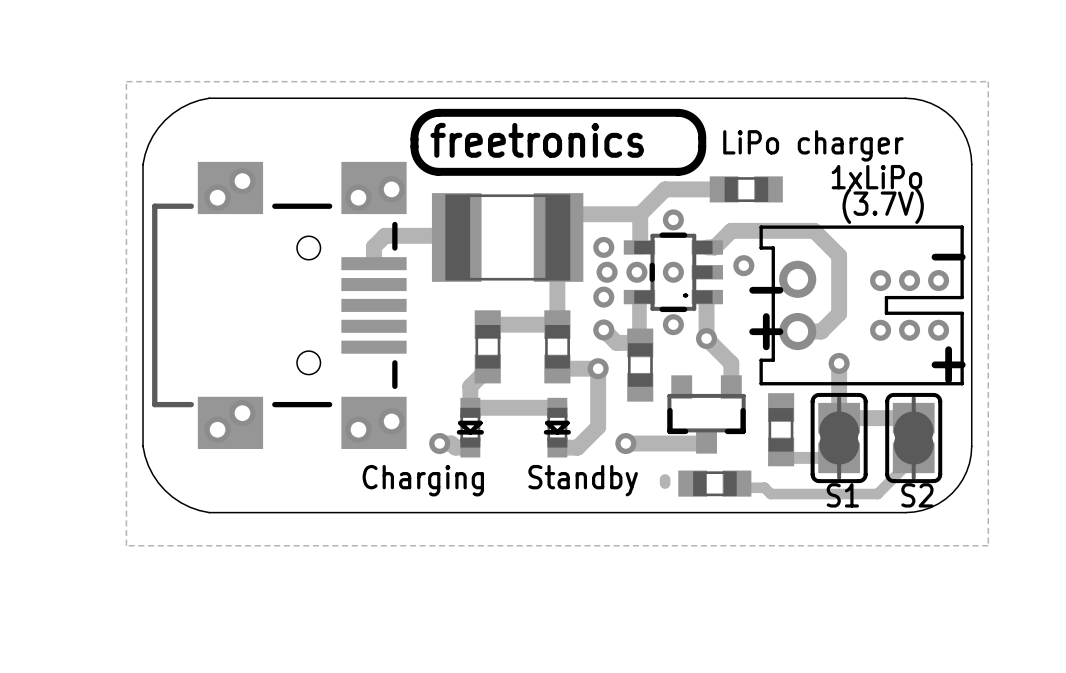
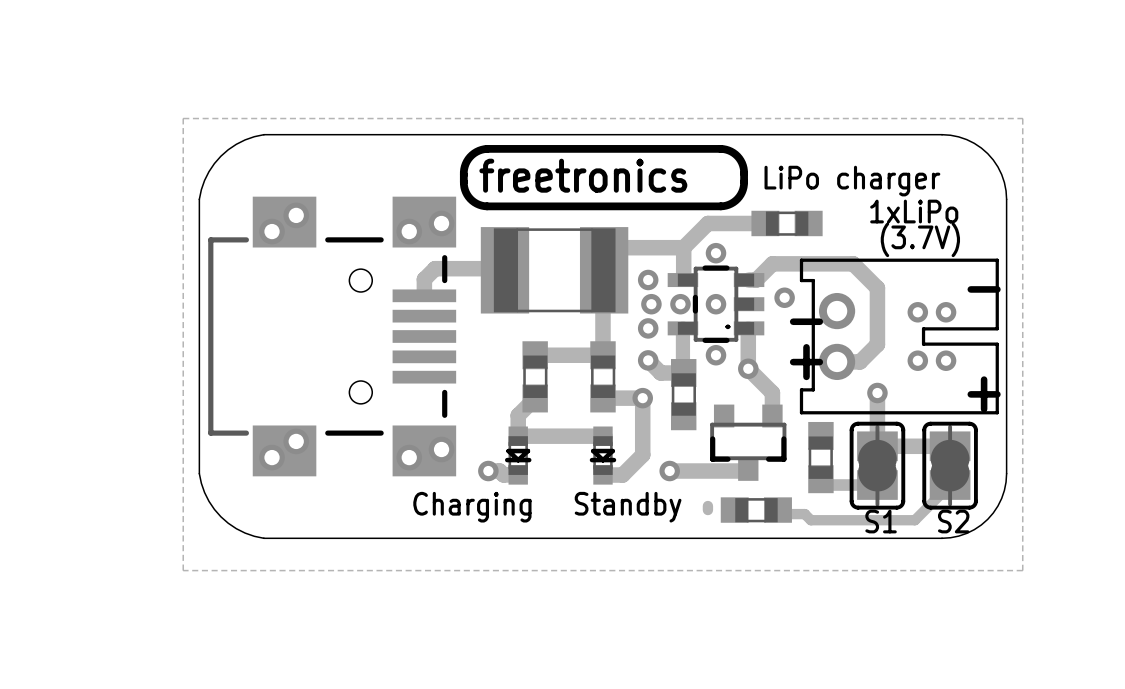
via: (938, 280) -> none
via: (938, 330) -> none

